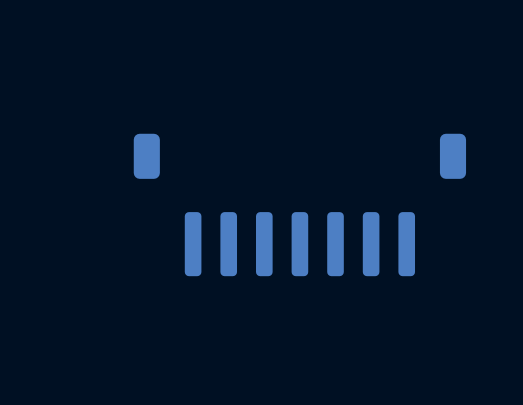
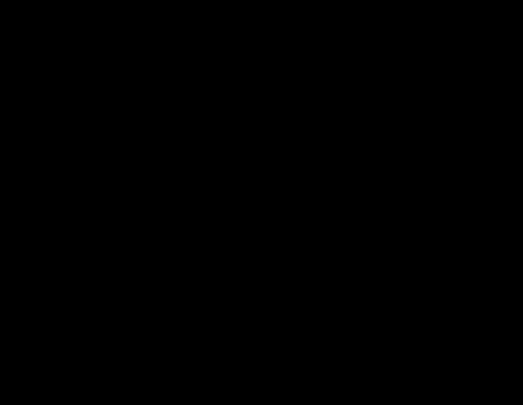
part: (299, 204) -> none

